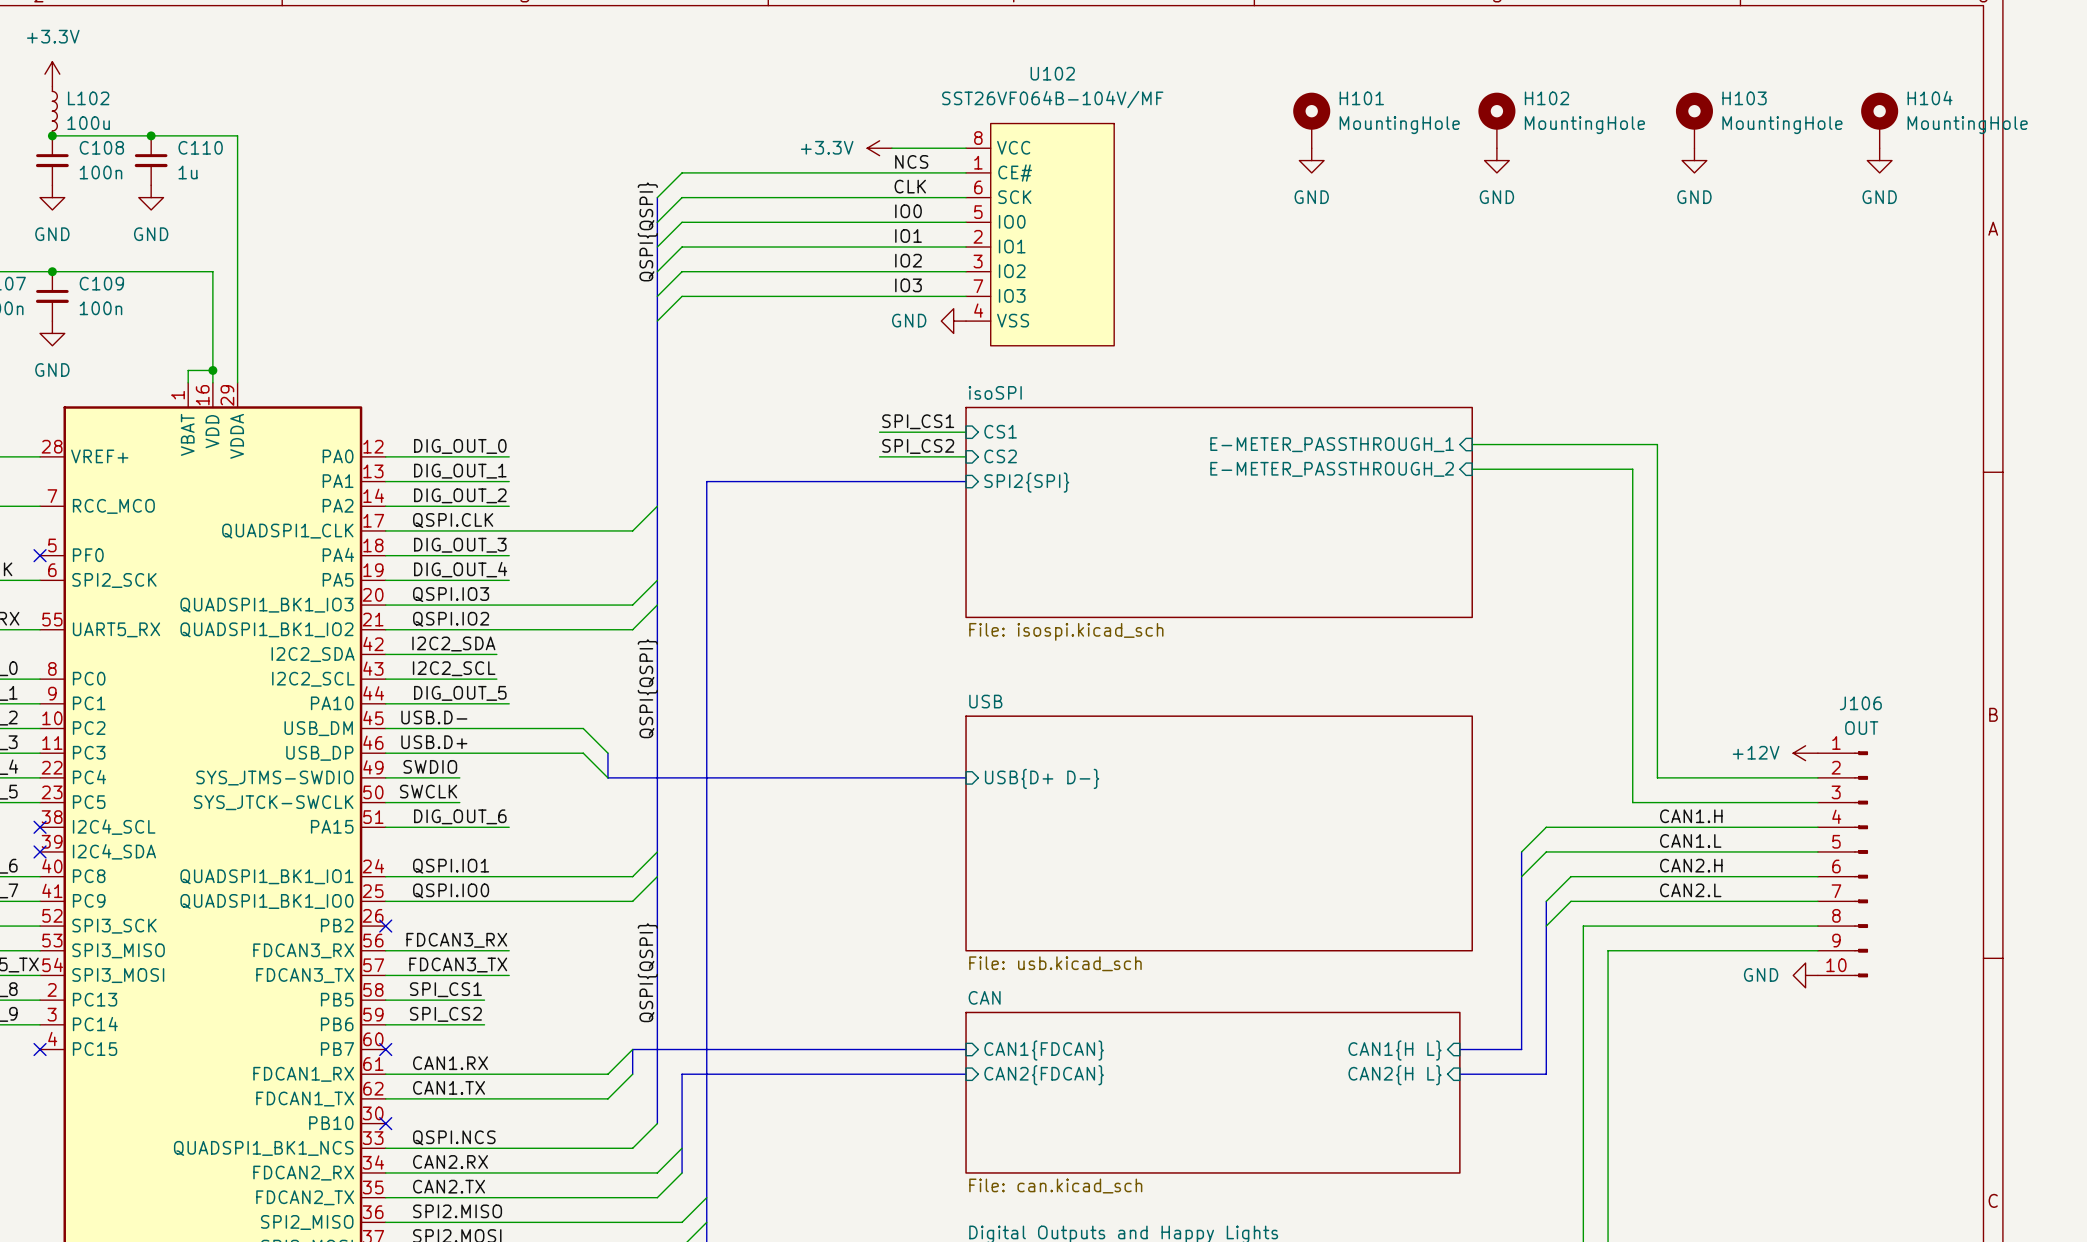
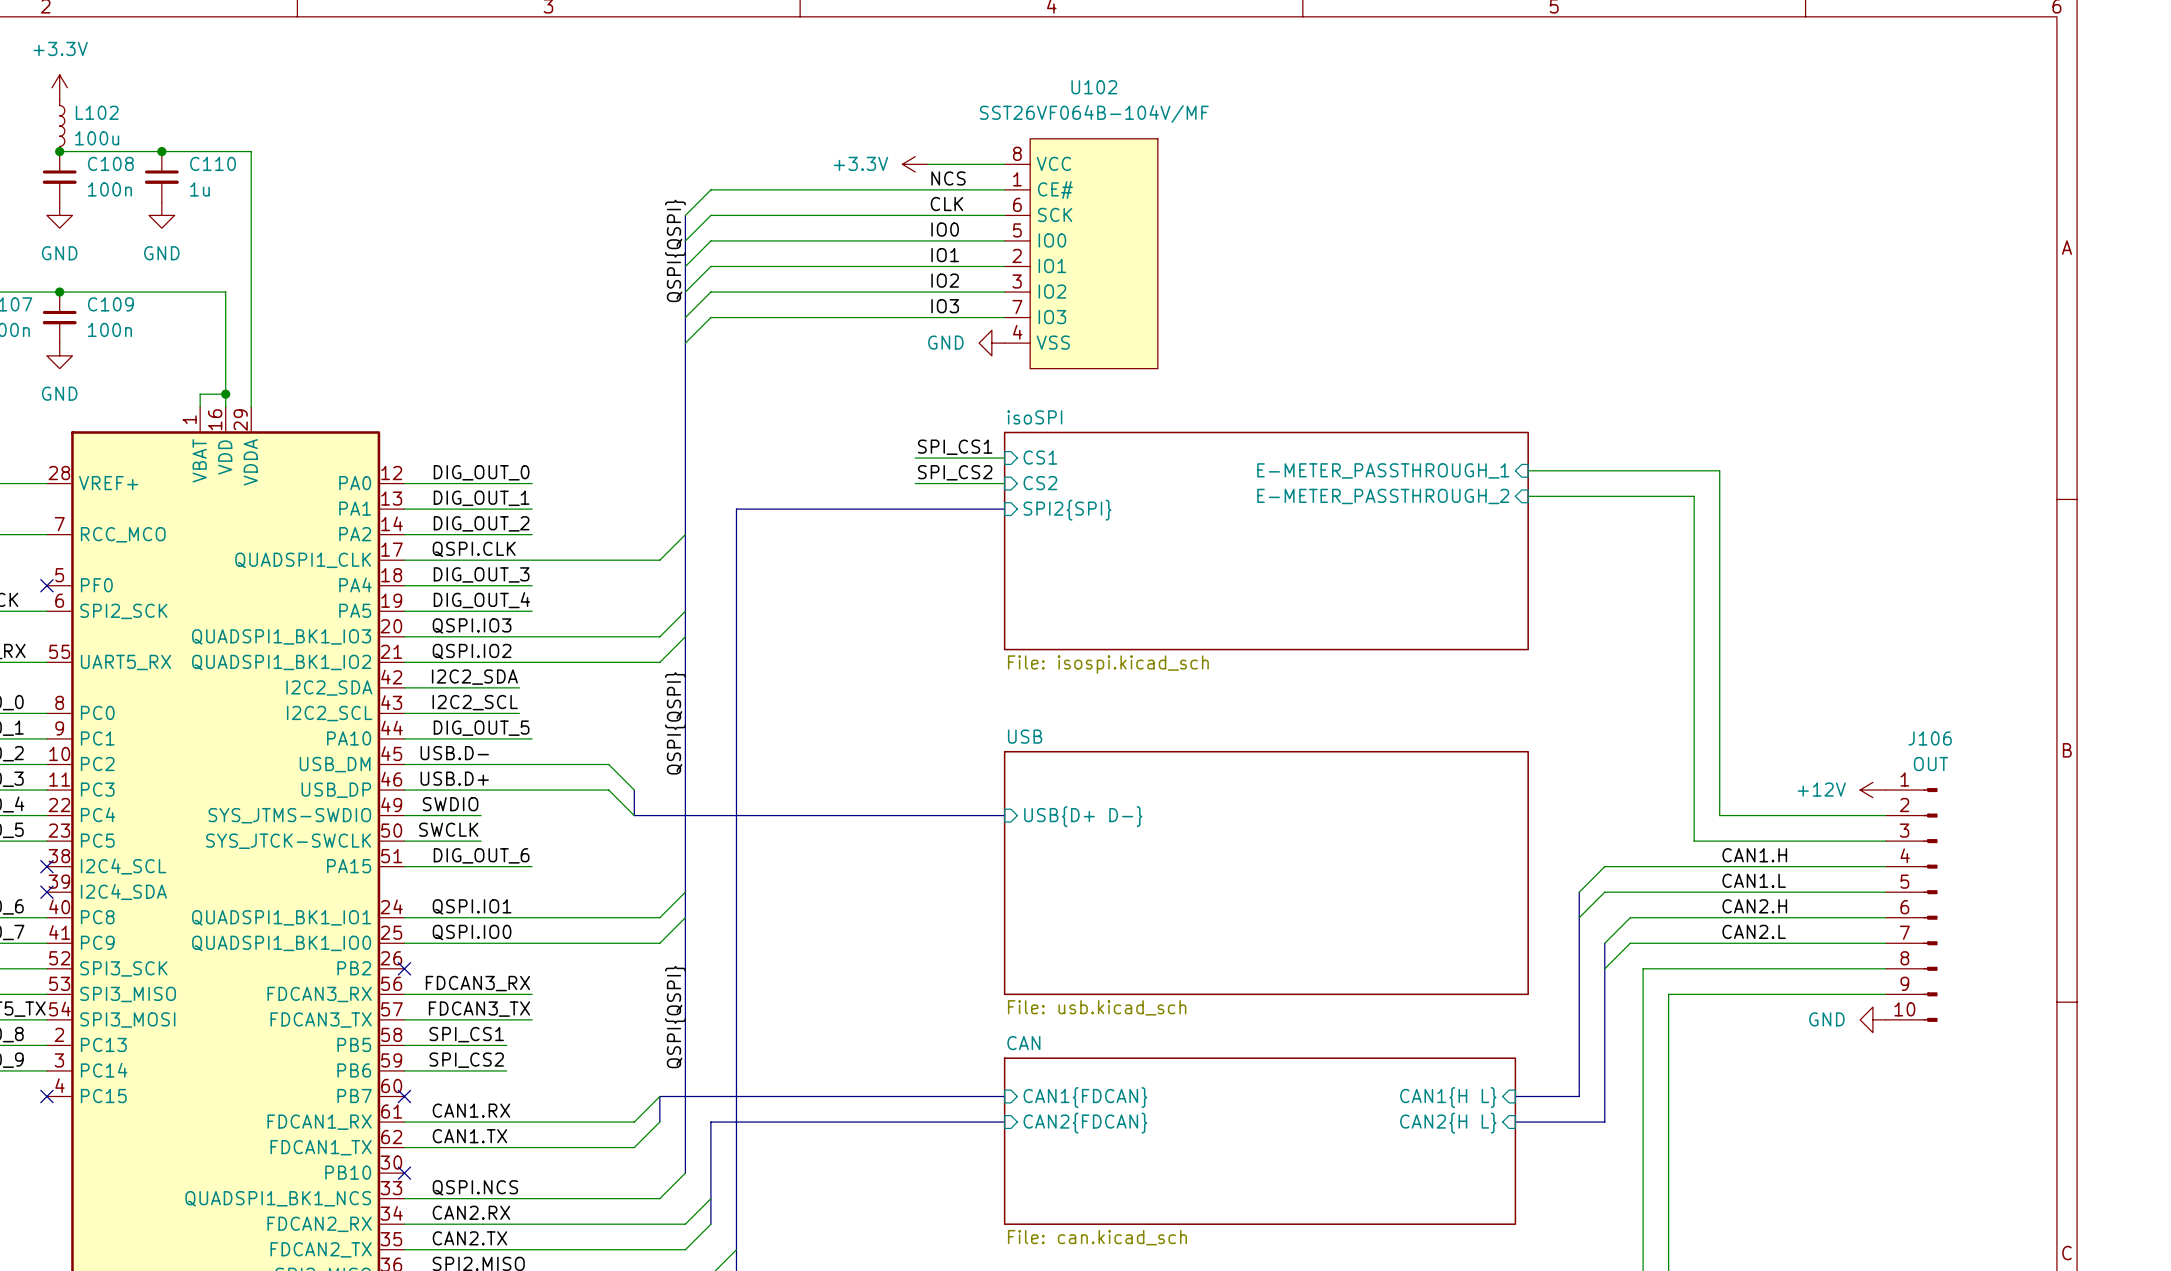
H101: MountingHole (1311, 120) -> none
H102: MountingHole (1496, 120) -> none
H103: MountingHole (1694, 120) -> none
H104: MountingHole (1879, 120) -> none
power symbol: GND (1311, 160) -> none
power symbol: GND (1496, 160) -> none
power symbol: GND (1694, 160) -> none
power symbol: GND (1879, 160) -> none

